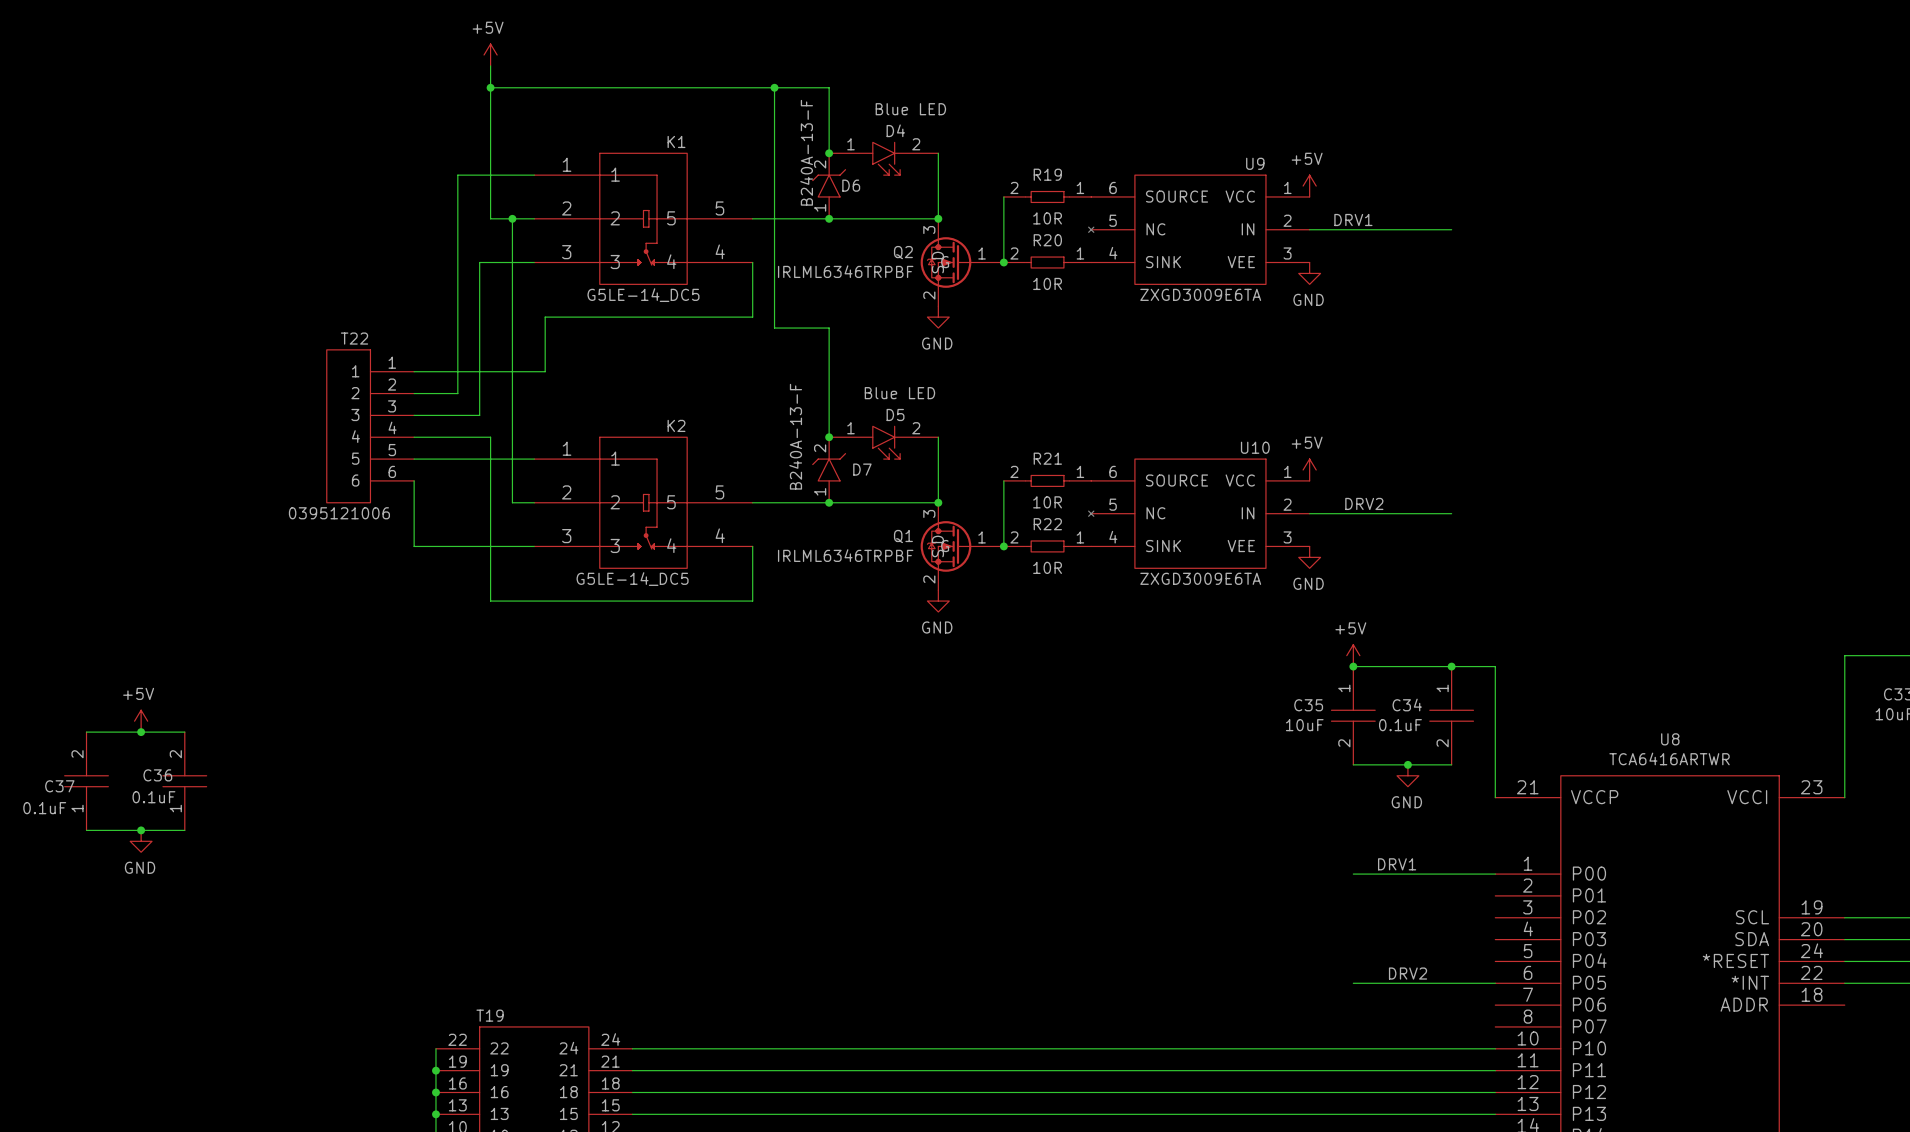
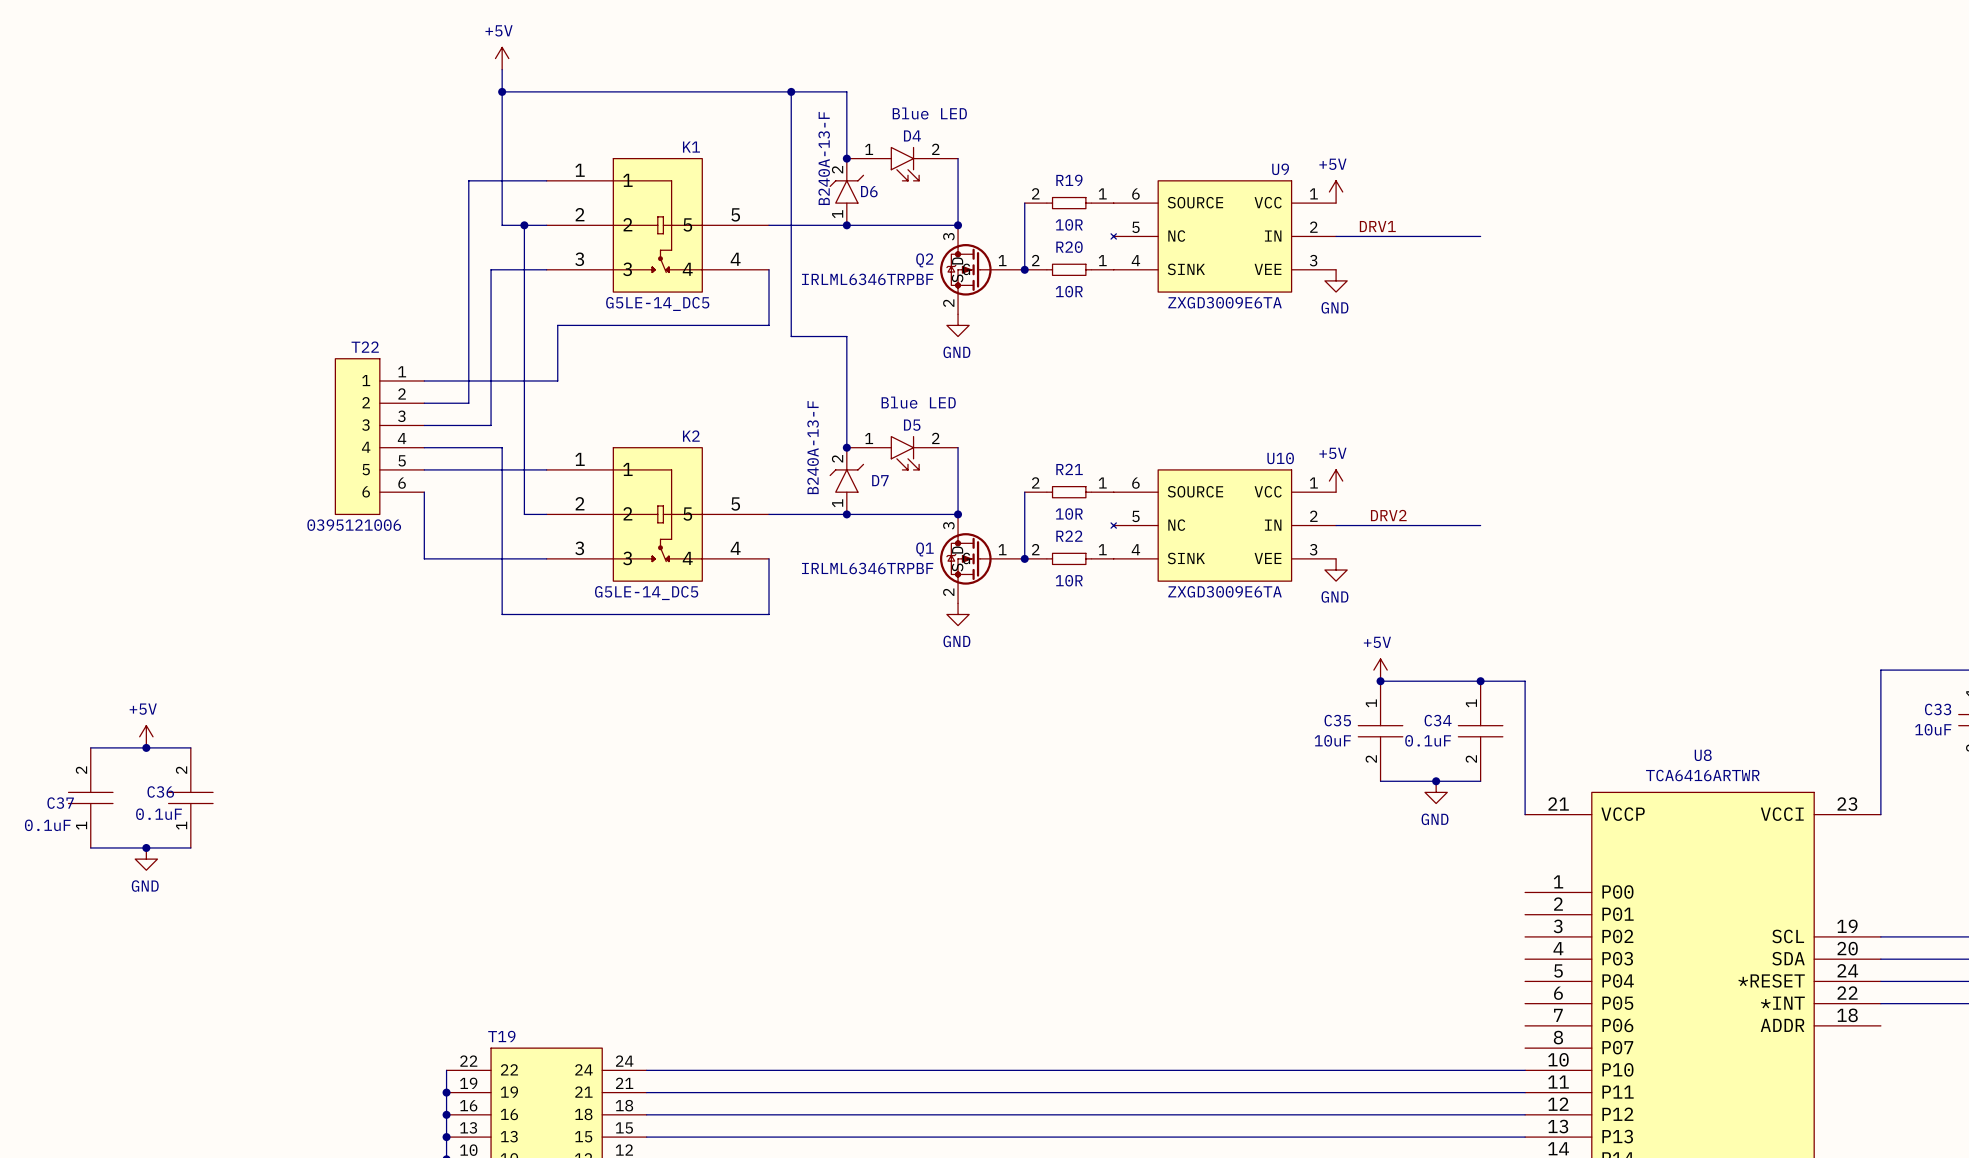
label: DRV1 (1397, 864) -> none
wire: (1353, 874) (1495, 874) -> none
label: DRV2 (1408, 973) -> none
wire: (1353, 983) (1495, 983) -> none

